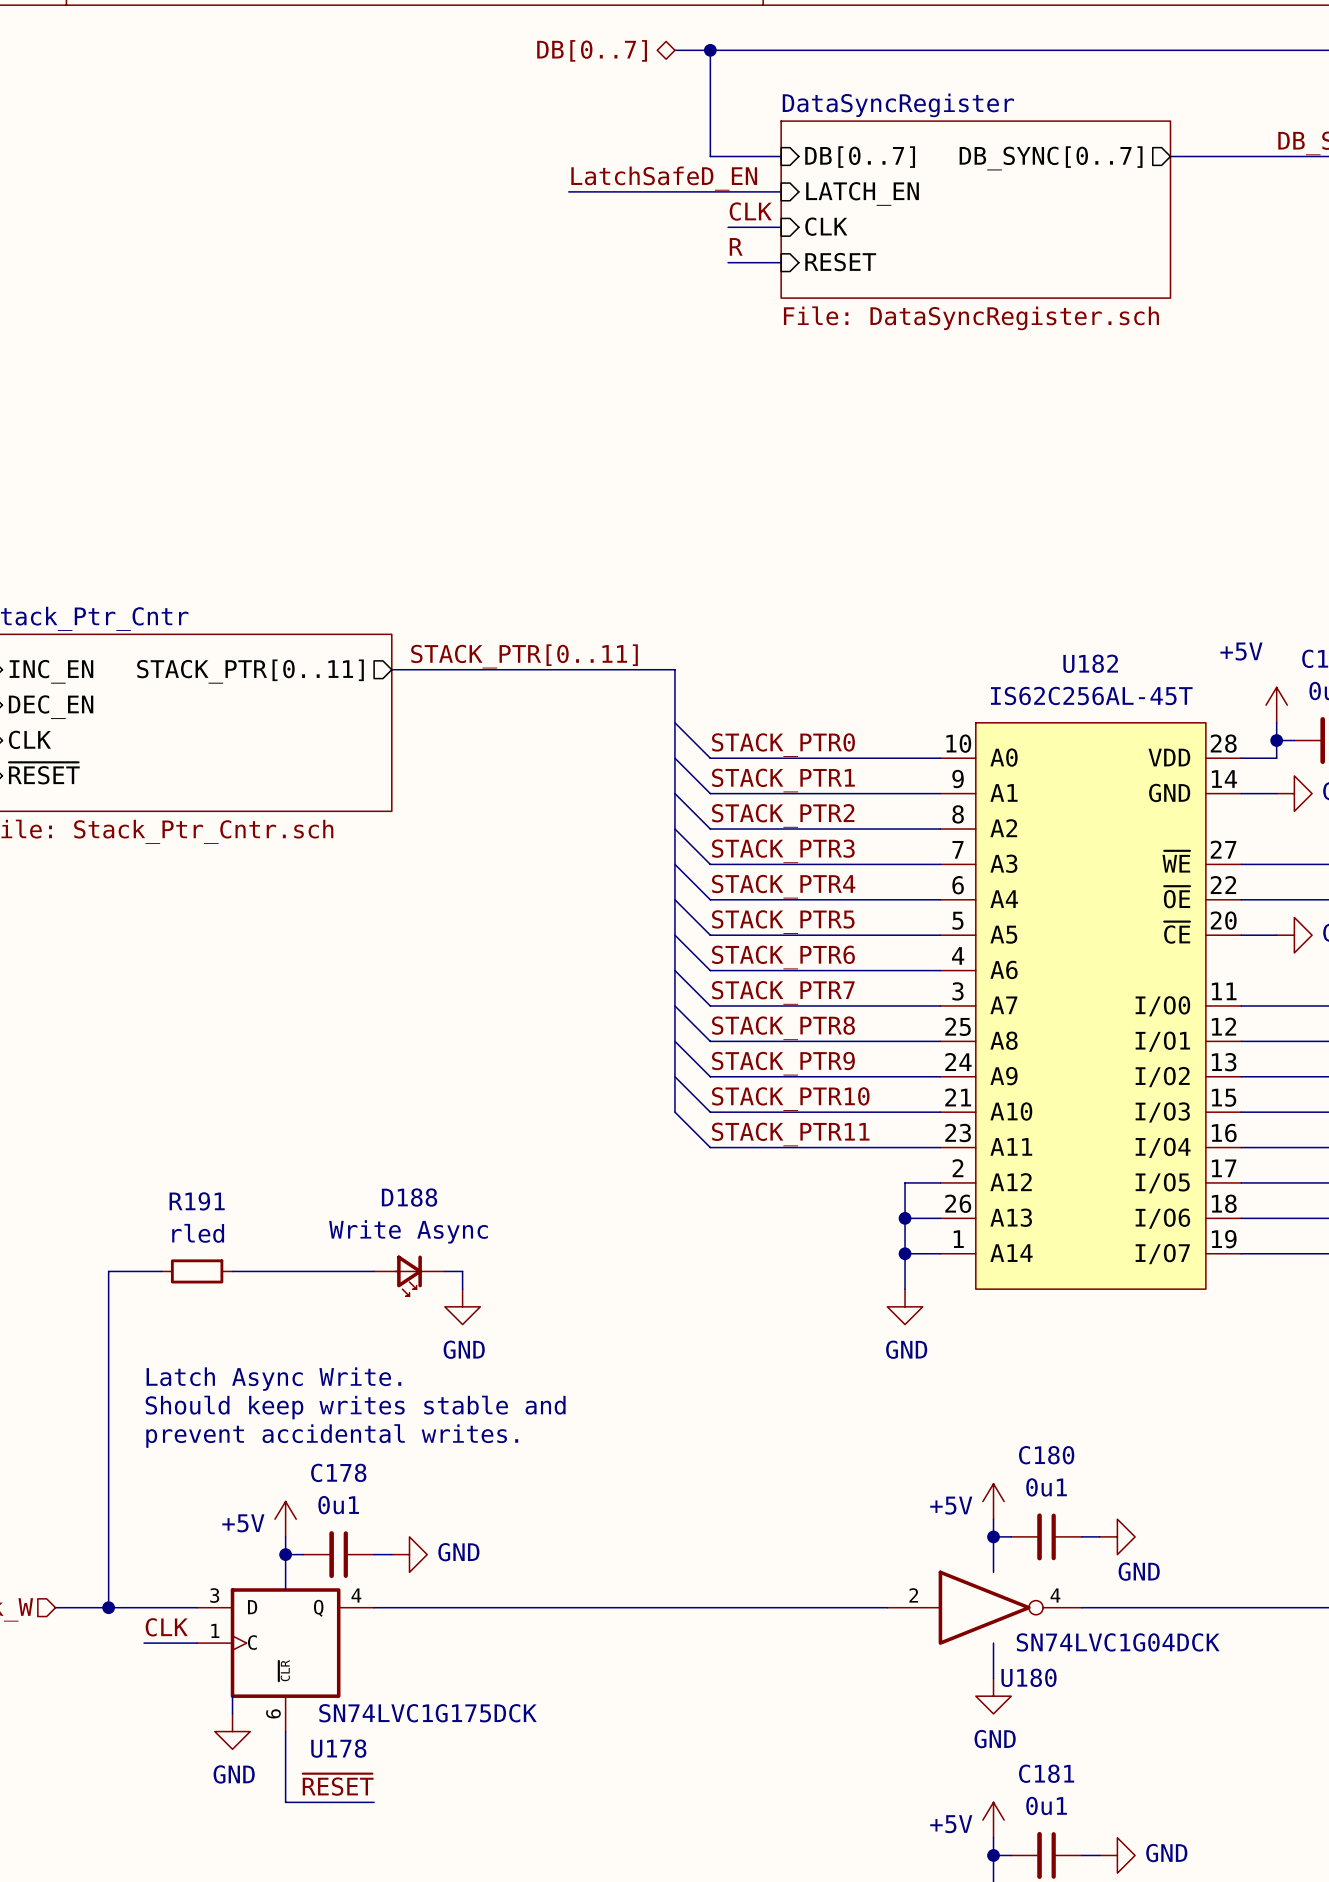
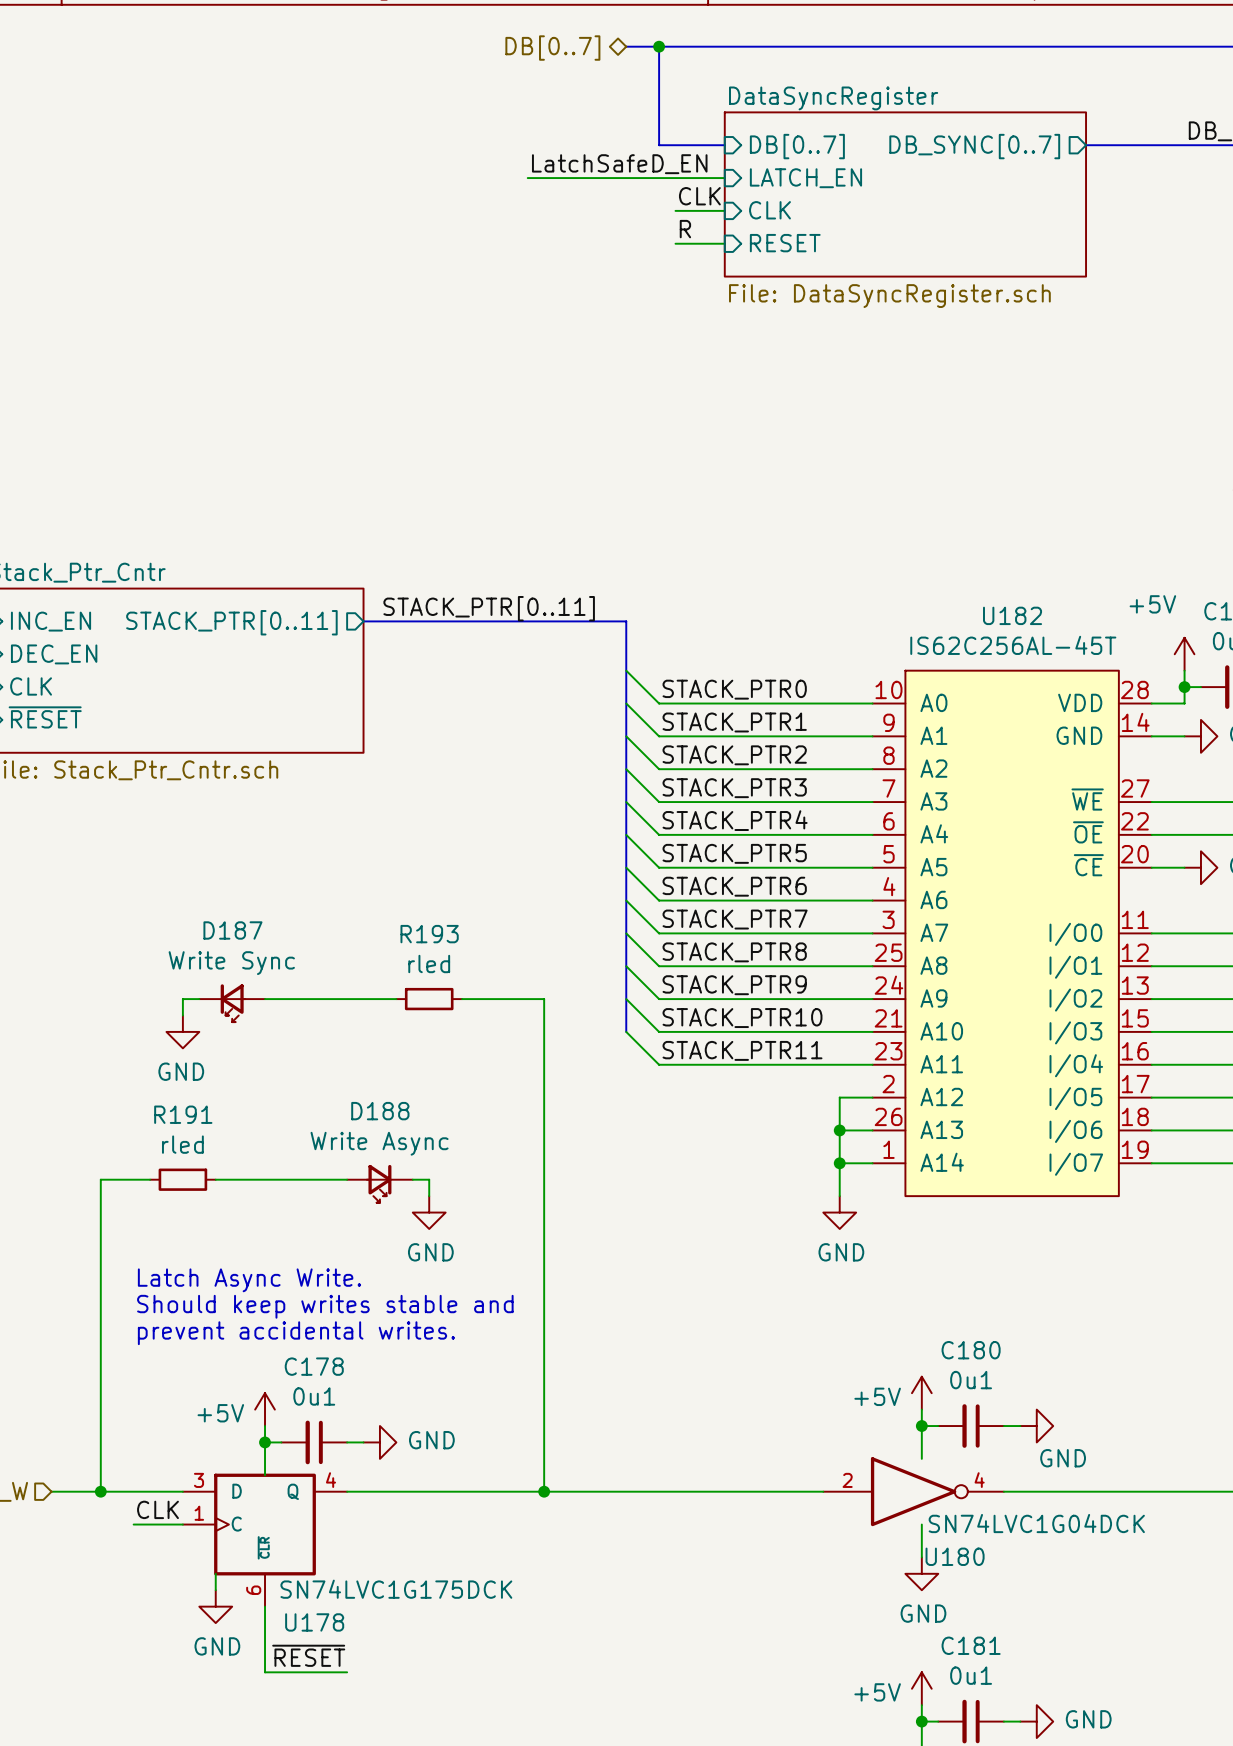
wire: none -> (199, 999) (182, 999) (182, 1015)
wire: none -> (265, 999) (396, 999)
R193: none -> rled (429, 999)
wire: none -> (462, 999) (544, 999) (544, 1491)
D187: none -> Write Sync (232, 1003)
power symbol: none -> GND (182, 1031)
junction: none -> (544, 1491)

